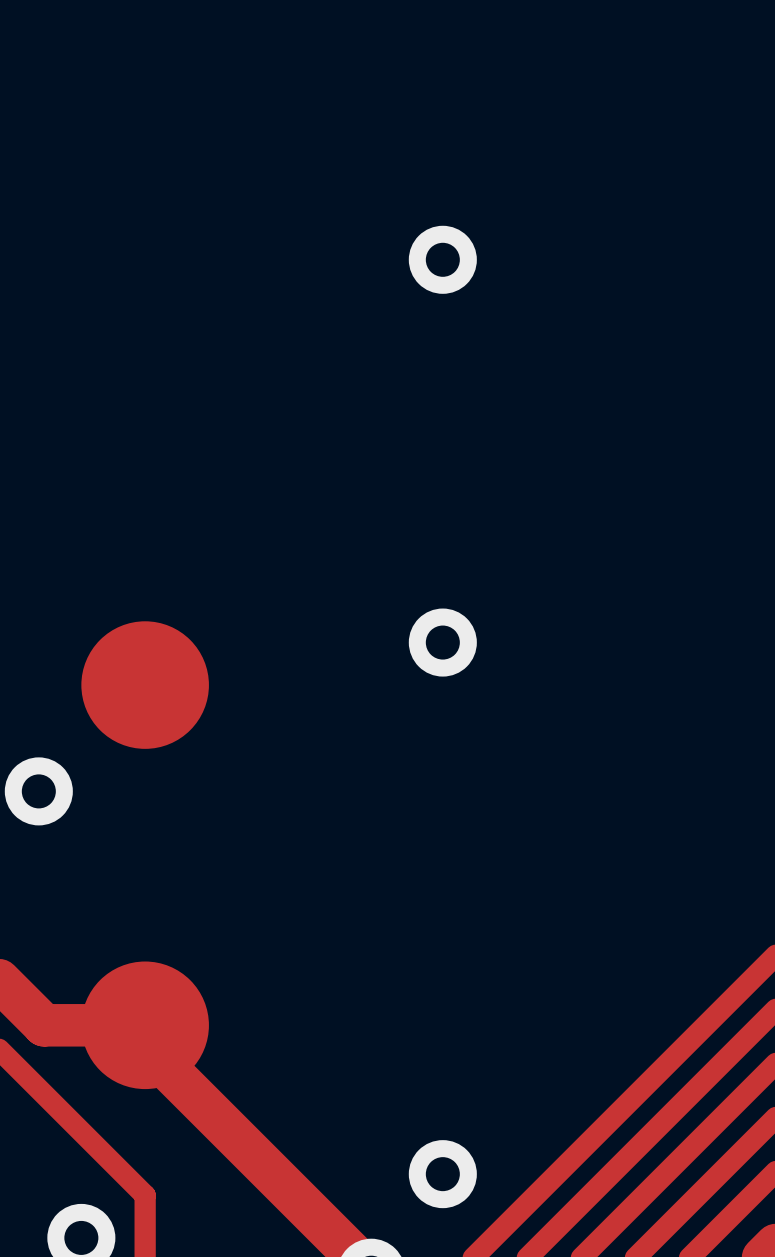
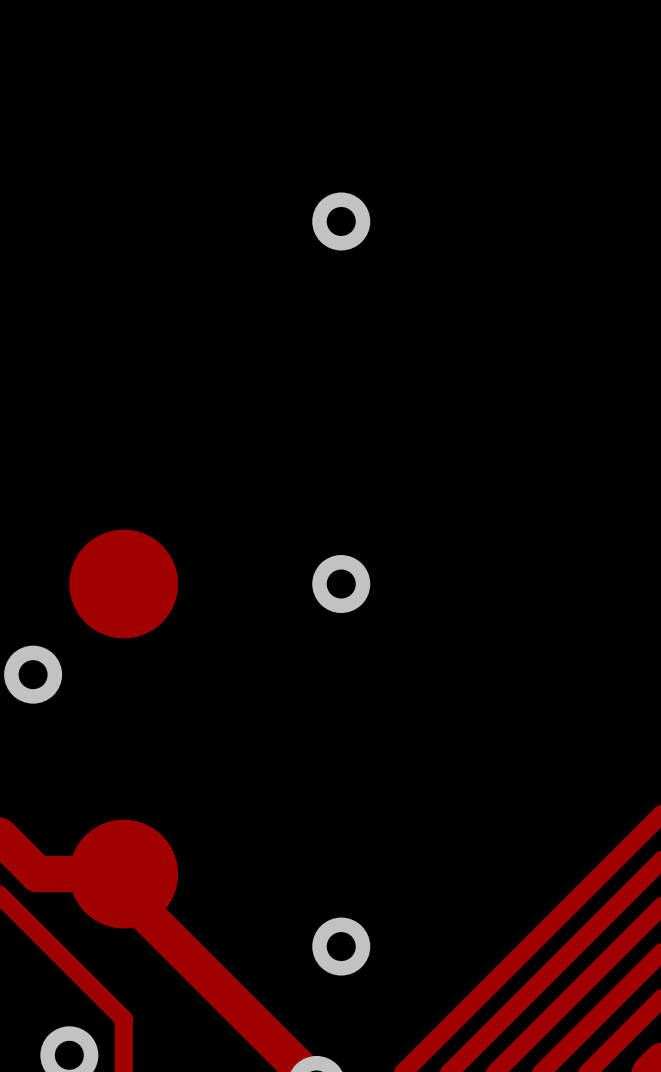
via position: (442, 259) -> (341, 221)
via position: (442, 642) -> (341, 584)
via position: (442, 1174) -> (341, 946)

